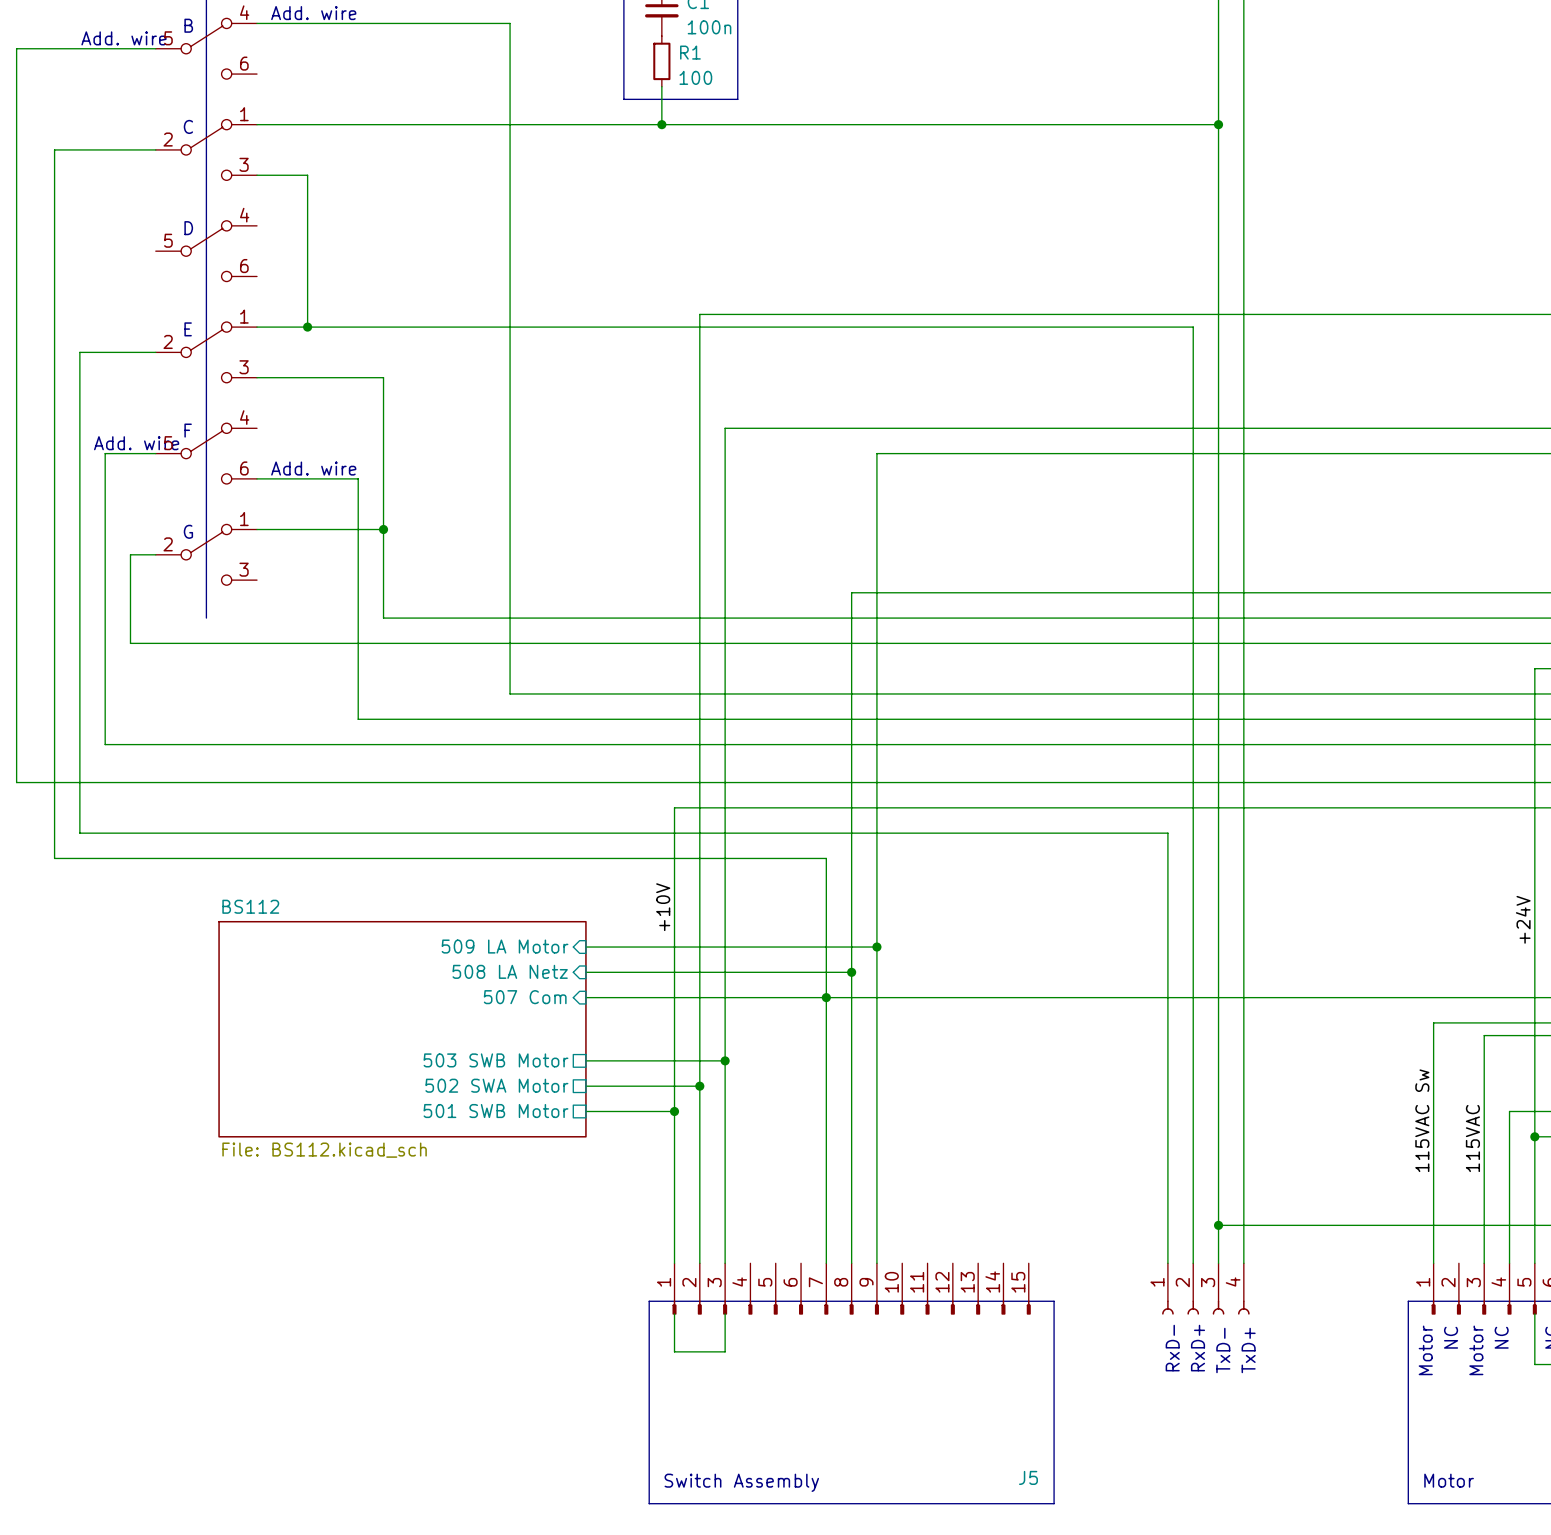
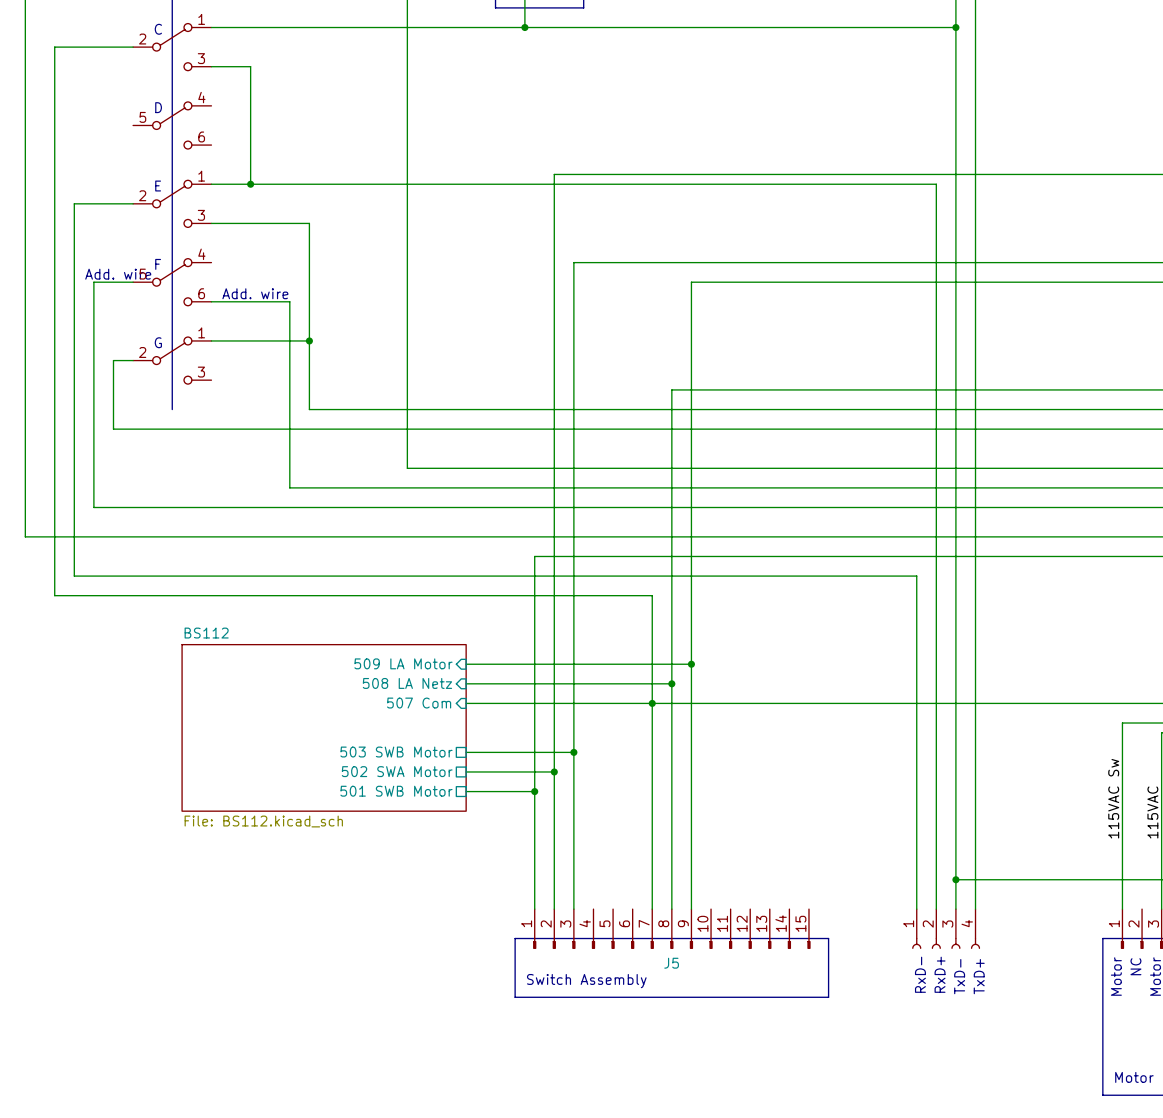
label: +10V (663, 907) -> none
wire: (674, 1313) (674, 1351) (725, 1351) (725, 1313) -> none
line: (649, 1377) (649, 1503) (1054, 1503) (1054, 1377) -> (515, 997) (828, 997)
J5 name position: J5 (1028, 1477) -> J5 (671, 963)
text position: Switch Assembly (741, 1482) -> Switch Assembly (586, 981)

